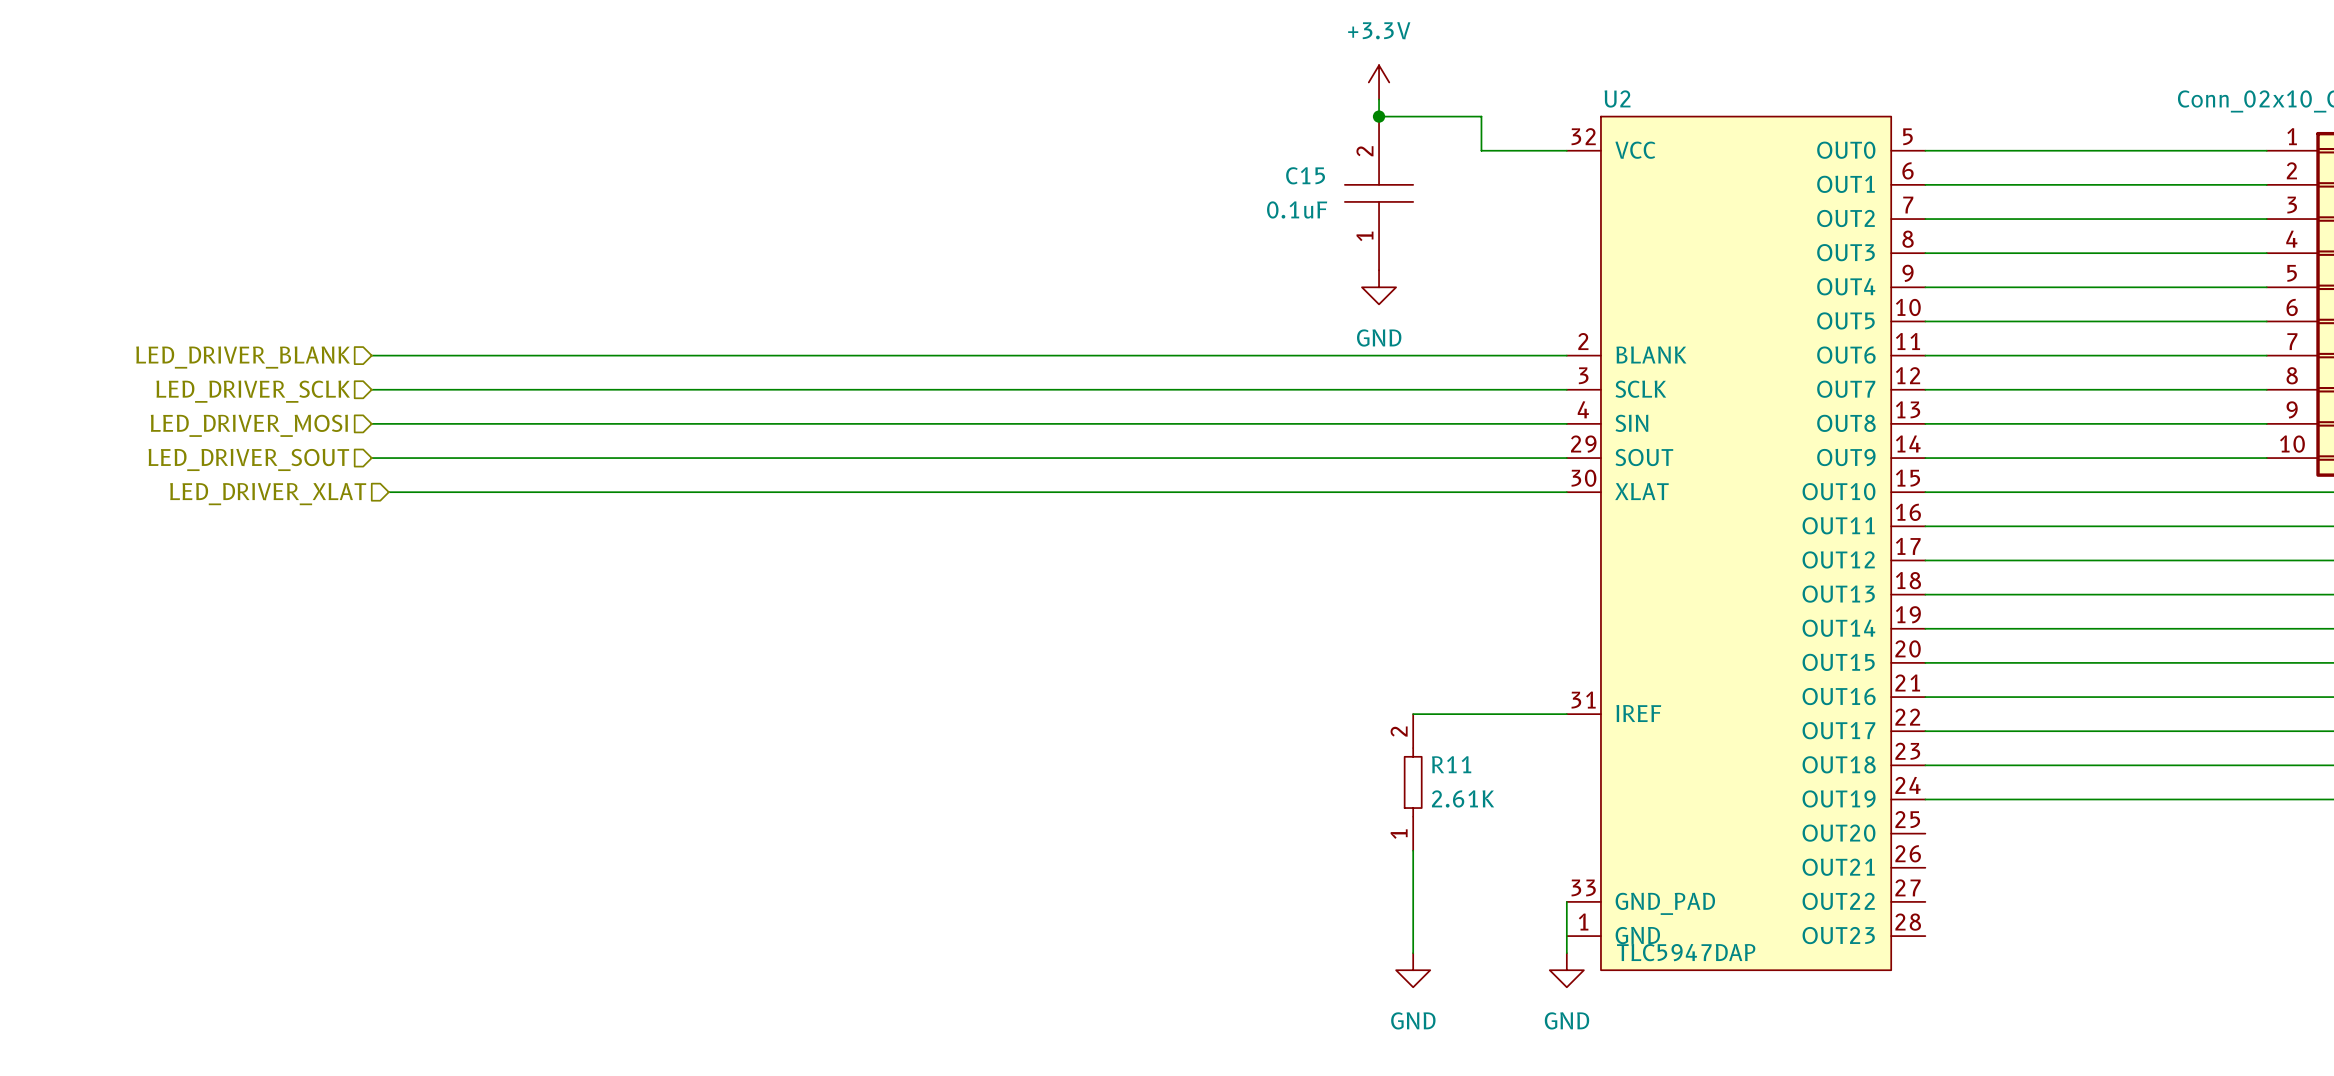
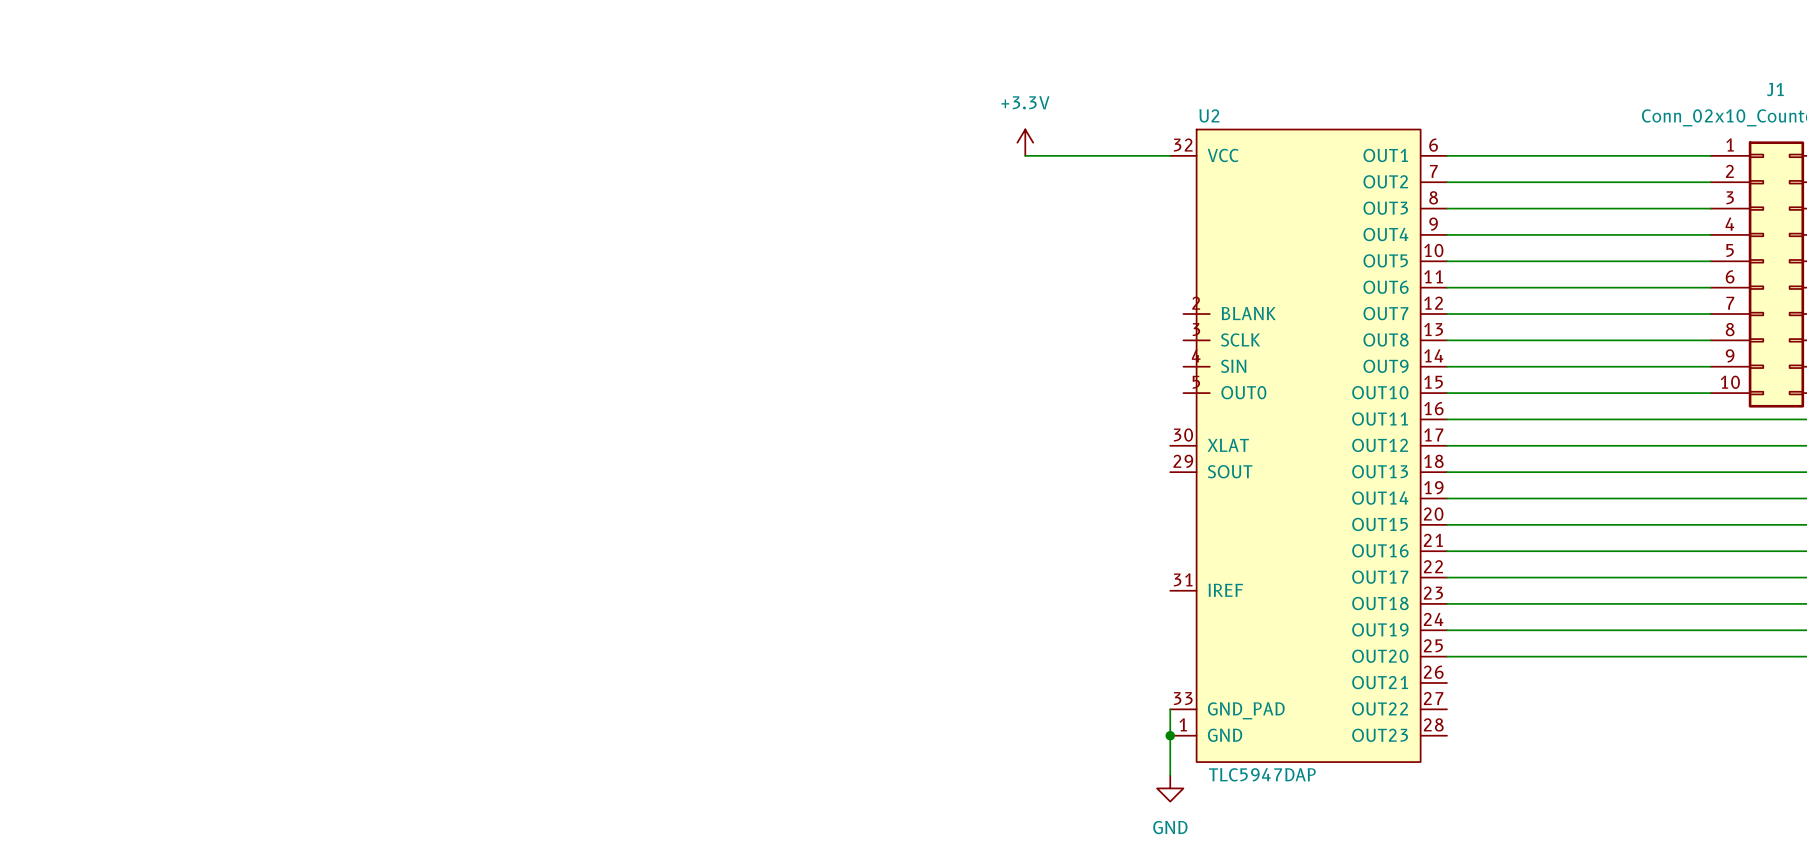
power symbol position: +3.3V (1379, 82) -> +3.3V (1025, 142)
wire: (1379, 99) (1379, 116) (1481, 116) (1481, 150) -> (1025, 155) (1104, 155)
junction: (1379, 116) -> none
U2 symbol: [1566, 116, 1926, 971] -> [1170, 129, 1447, 763]
C15: (1379, 193) -> none
power symbol: GND (1379, 287) -> none
wire: (371, 355) (1566, 355) -> none
hierarchical label: LED_DRIVER_BLANK (243, 357) -> none
wire: (371, 389) (1566, 389) -> none
hierarchical label: LED_DRIVER_SCLK (253, 391) -> none
wire: (371, 423) (1566, 423) -> none
hierarchical label: LED_DRIVER_MOSI (249, 425) -> none
wire: (371, 458) (1566, 458) -> none
hierarchical label: LED_DRIVER_SOUT (248, 459) -> none
wire: (388, 492) (1566, 492) -> none
hierarchical label: LED_DRIVER_XLAT (268, 494) -> none
wire: (1413, 714) (1566, 714) -> none
R11: (1413, 782) -> none
wire: (1413, 850) (1413, 953) -> none
wire: none -> (1170, 709) (1170, 735)
junction: none -> (1170, 735)
power symbol: GND (1413, 970) -> none

